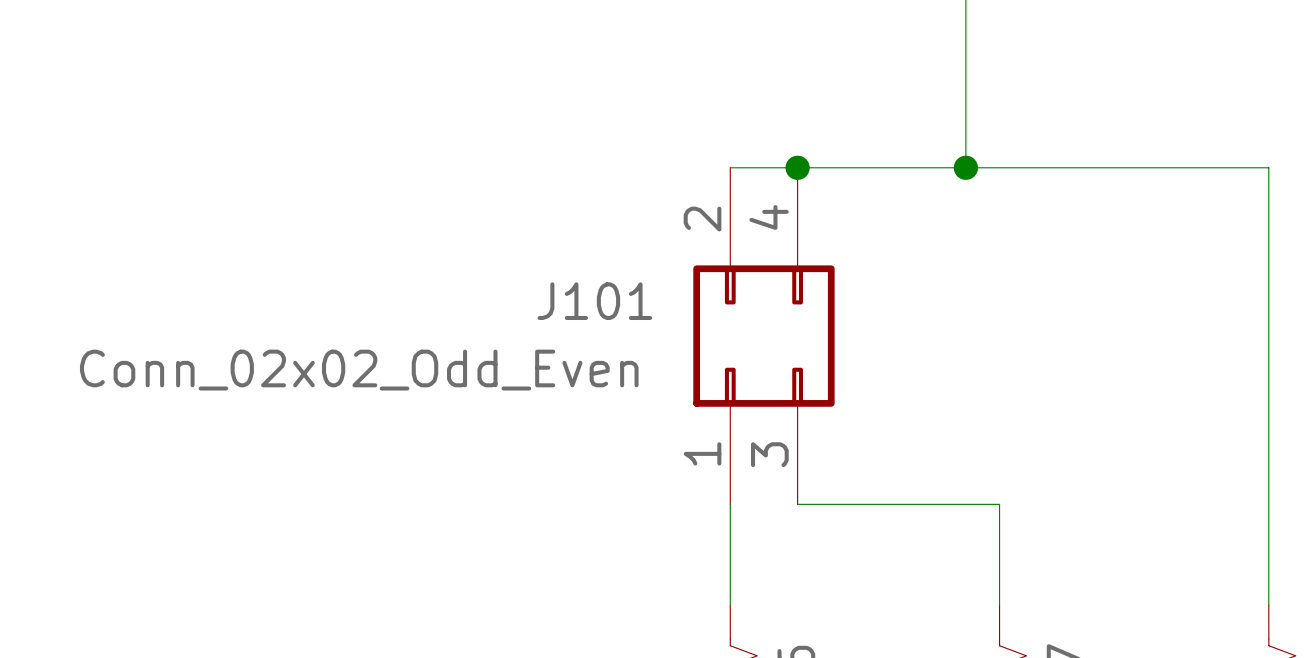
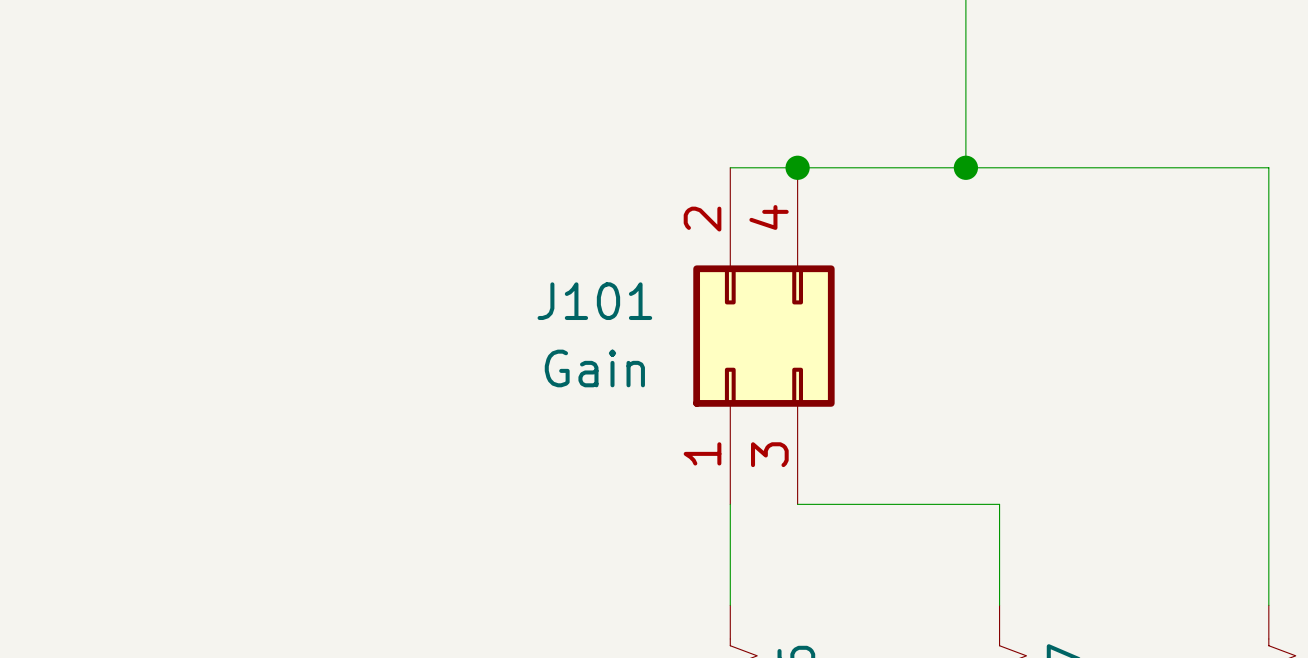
J101 value: Conn_02x02_Odd_Even (359, 370) -> Gain (594, 368)

